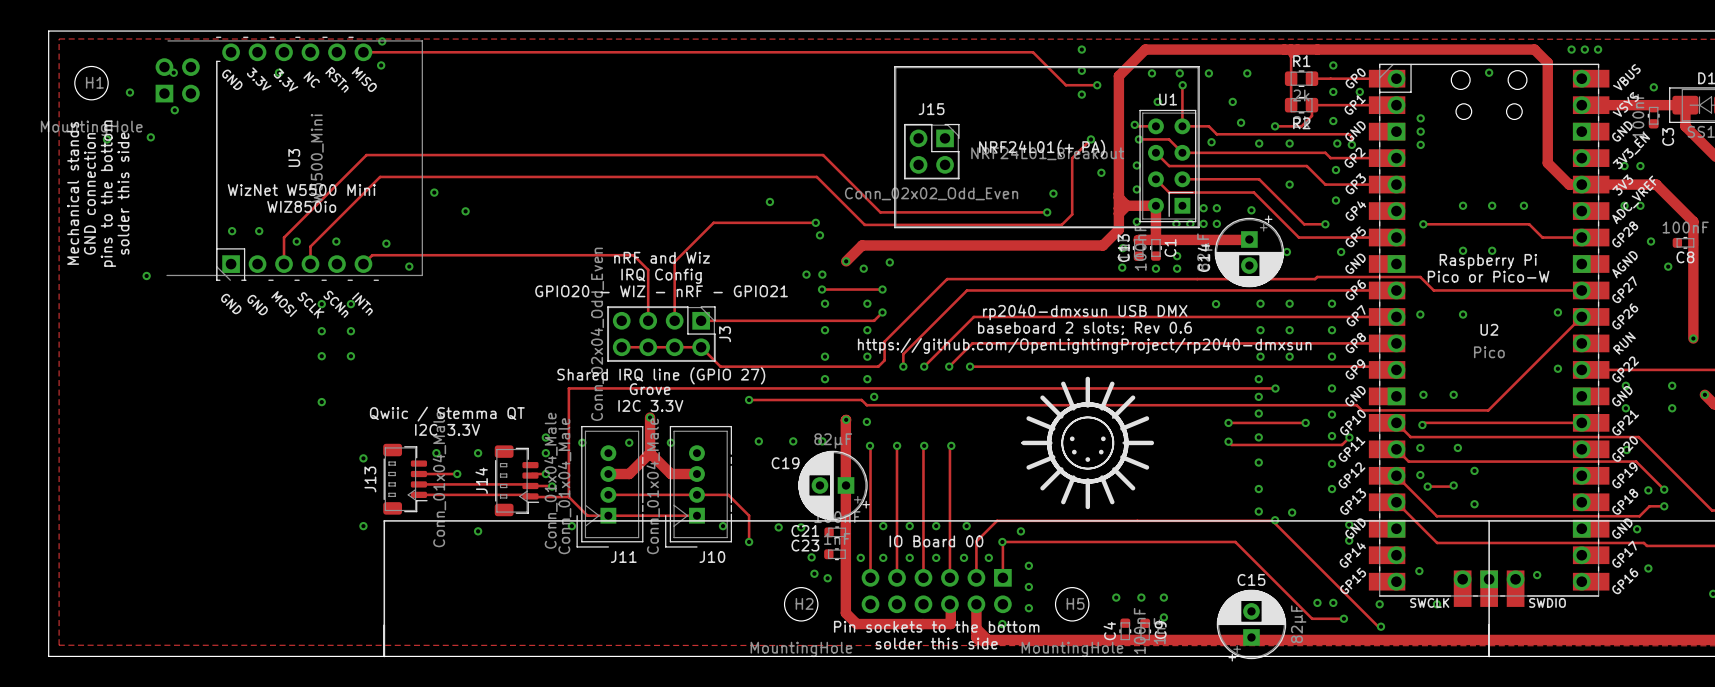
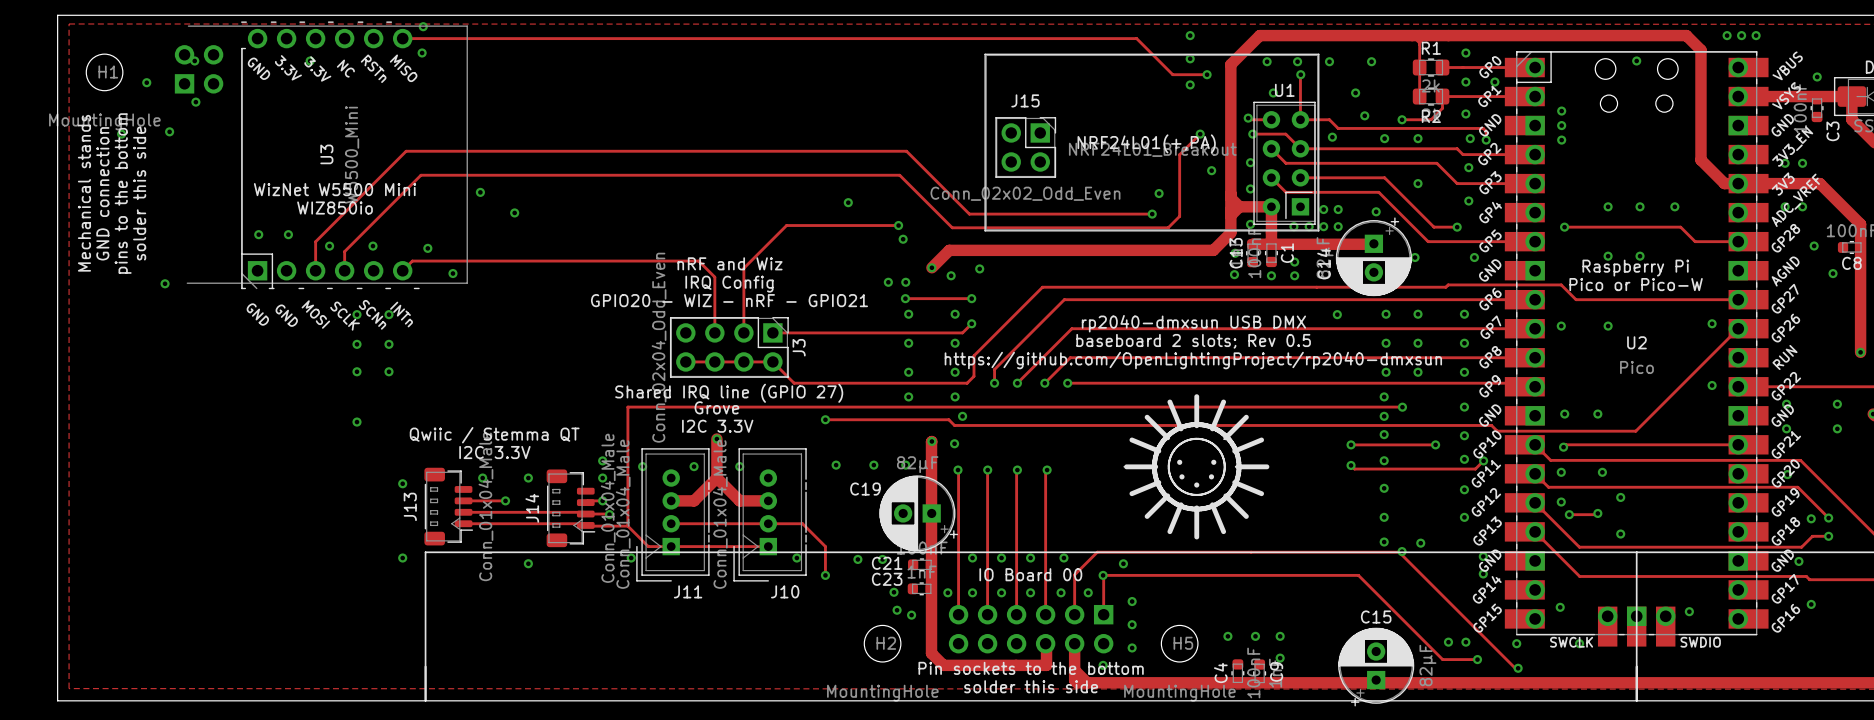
text: baseboard 2 slots; Rev 0.6 (1084, 328) -> baseboard 2 slots; Rev 0.5 (1193, 341)

